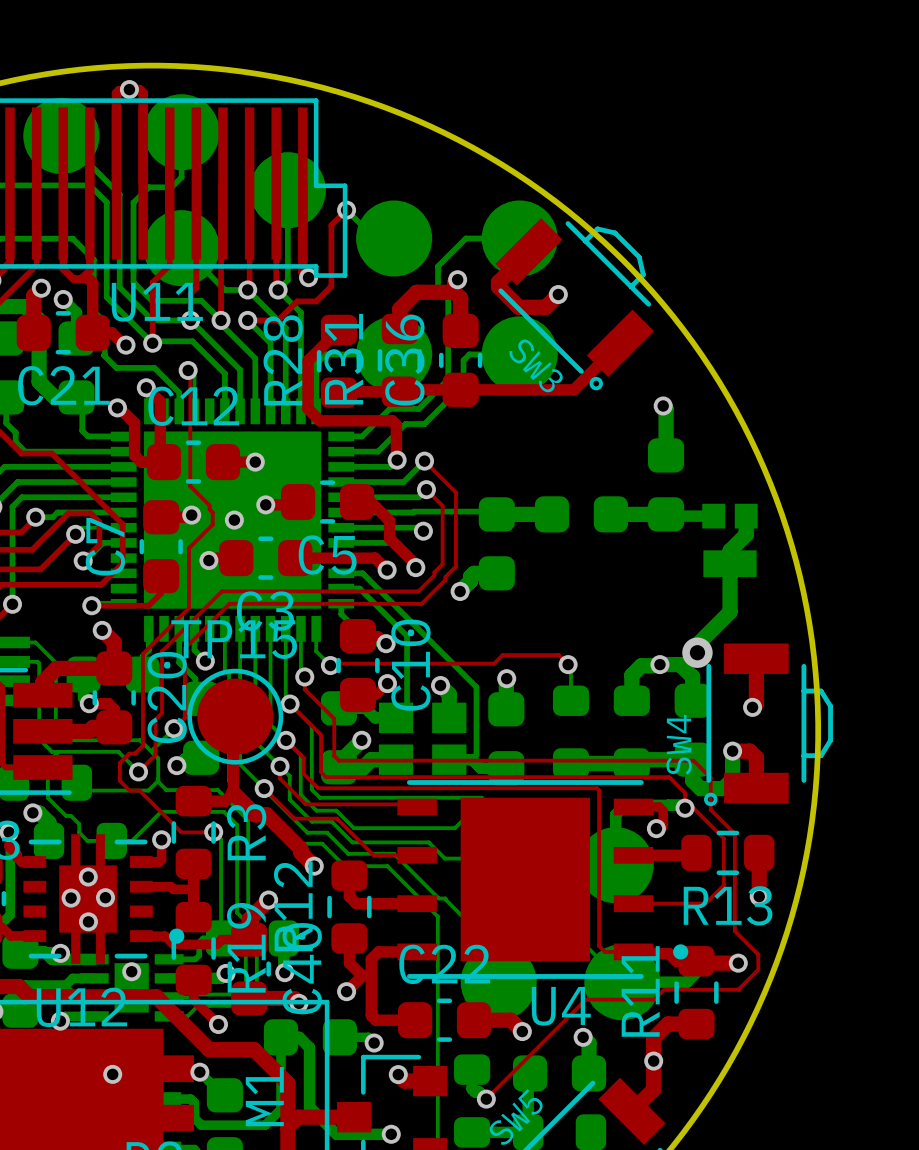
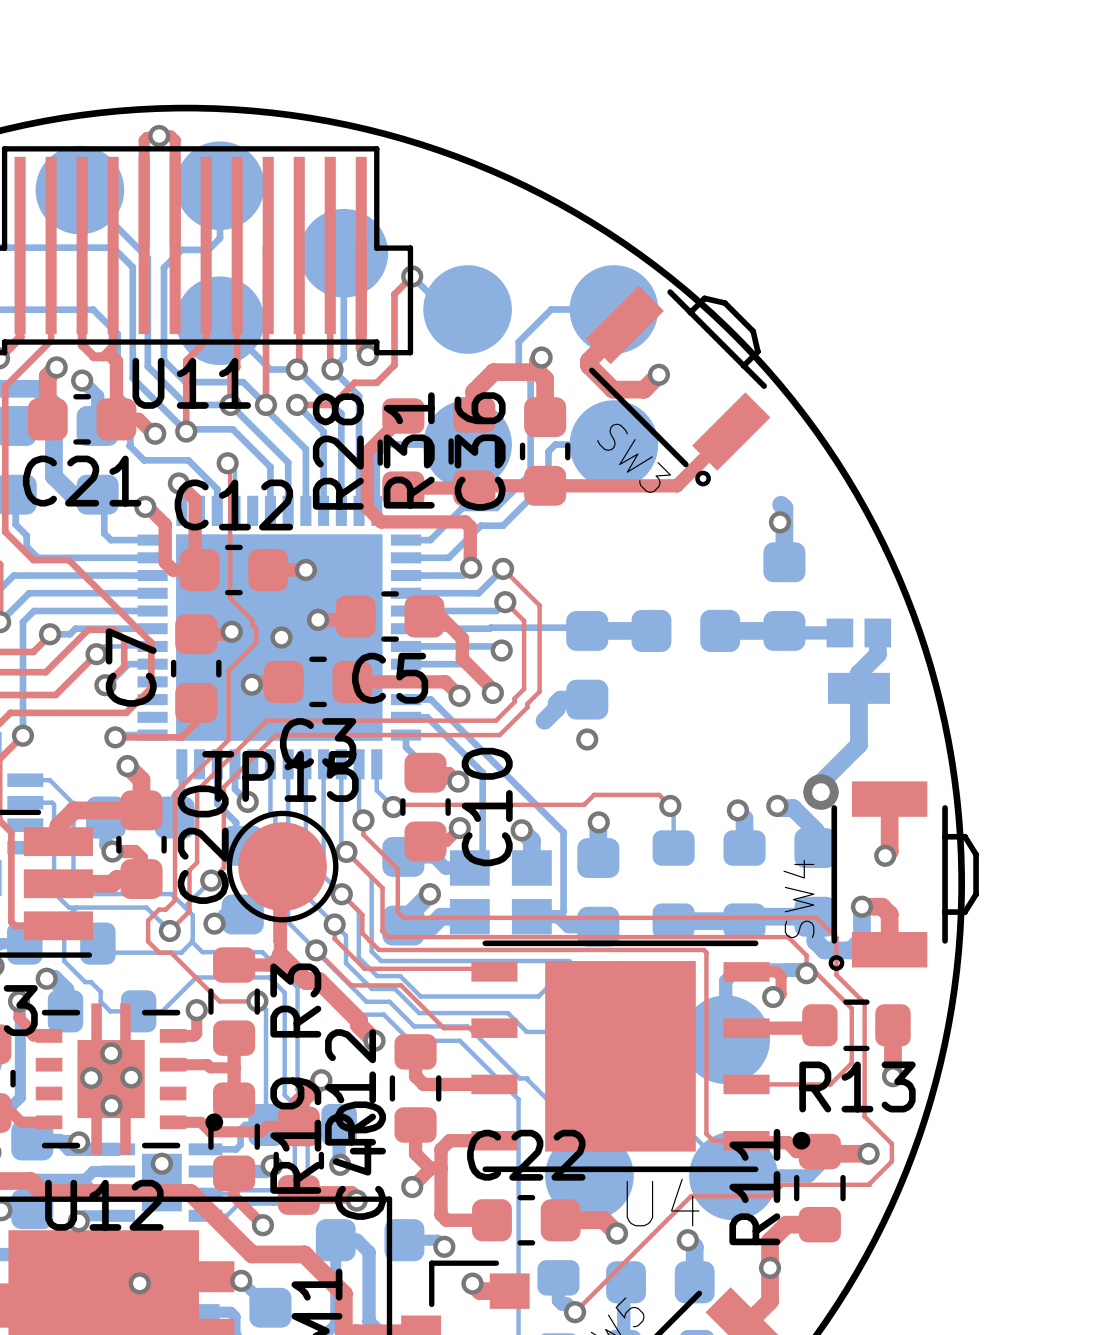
via position: (663, 405) -> (779, 522)
via position: (460, 591) -> (587, 739)
via: none -> (737, 810)
bottom track: (631, 675) (641, 665) (680, 664) (692, 677) (692, 685) -> (779, 808) (793, 808) (815, 830)

